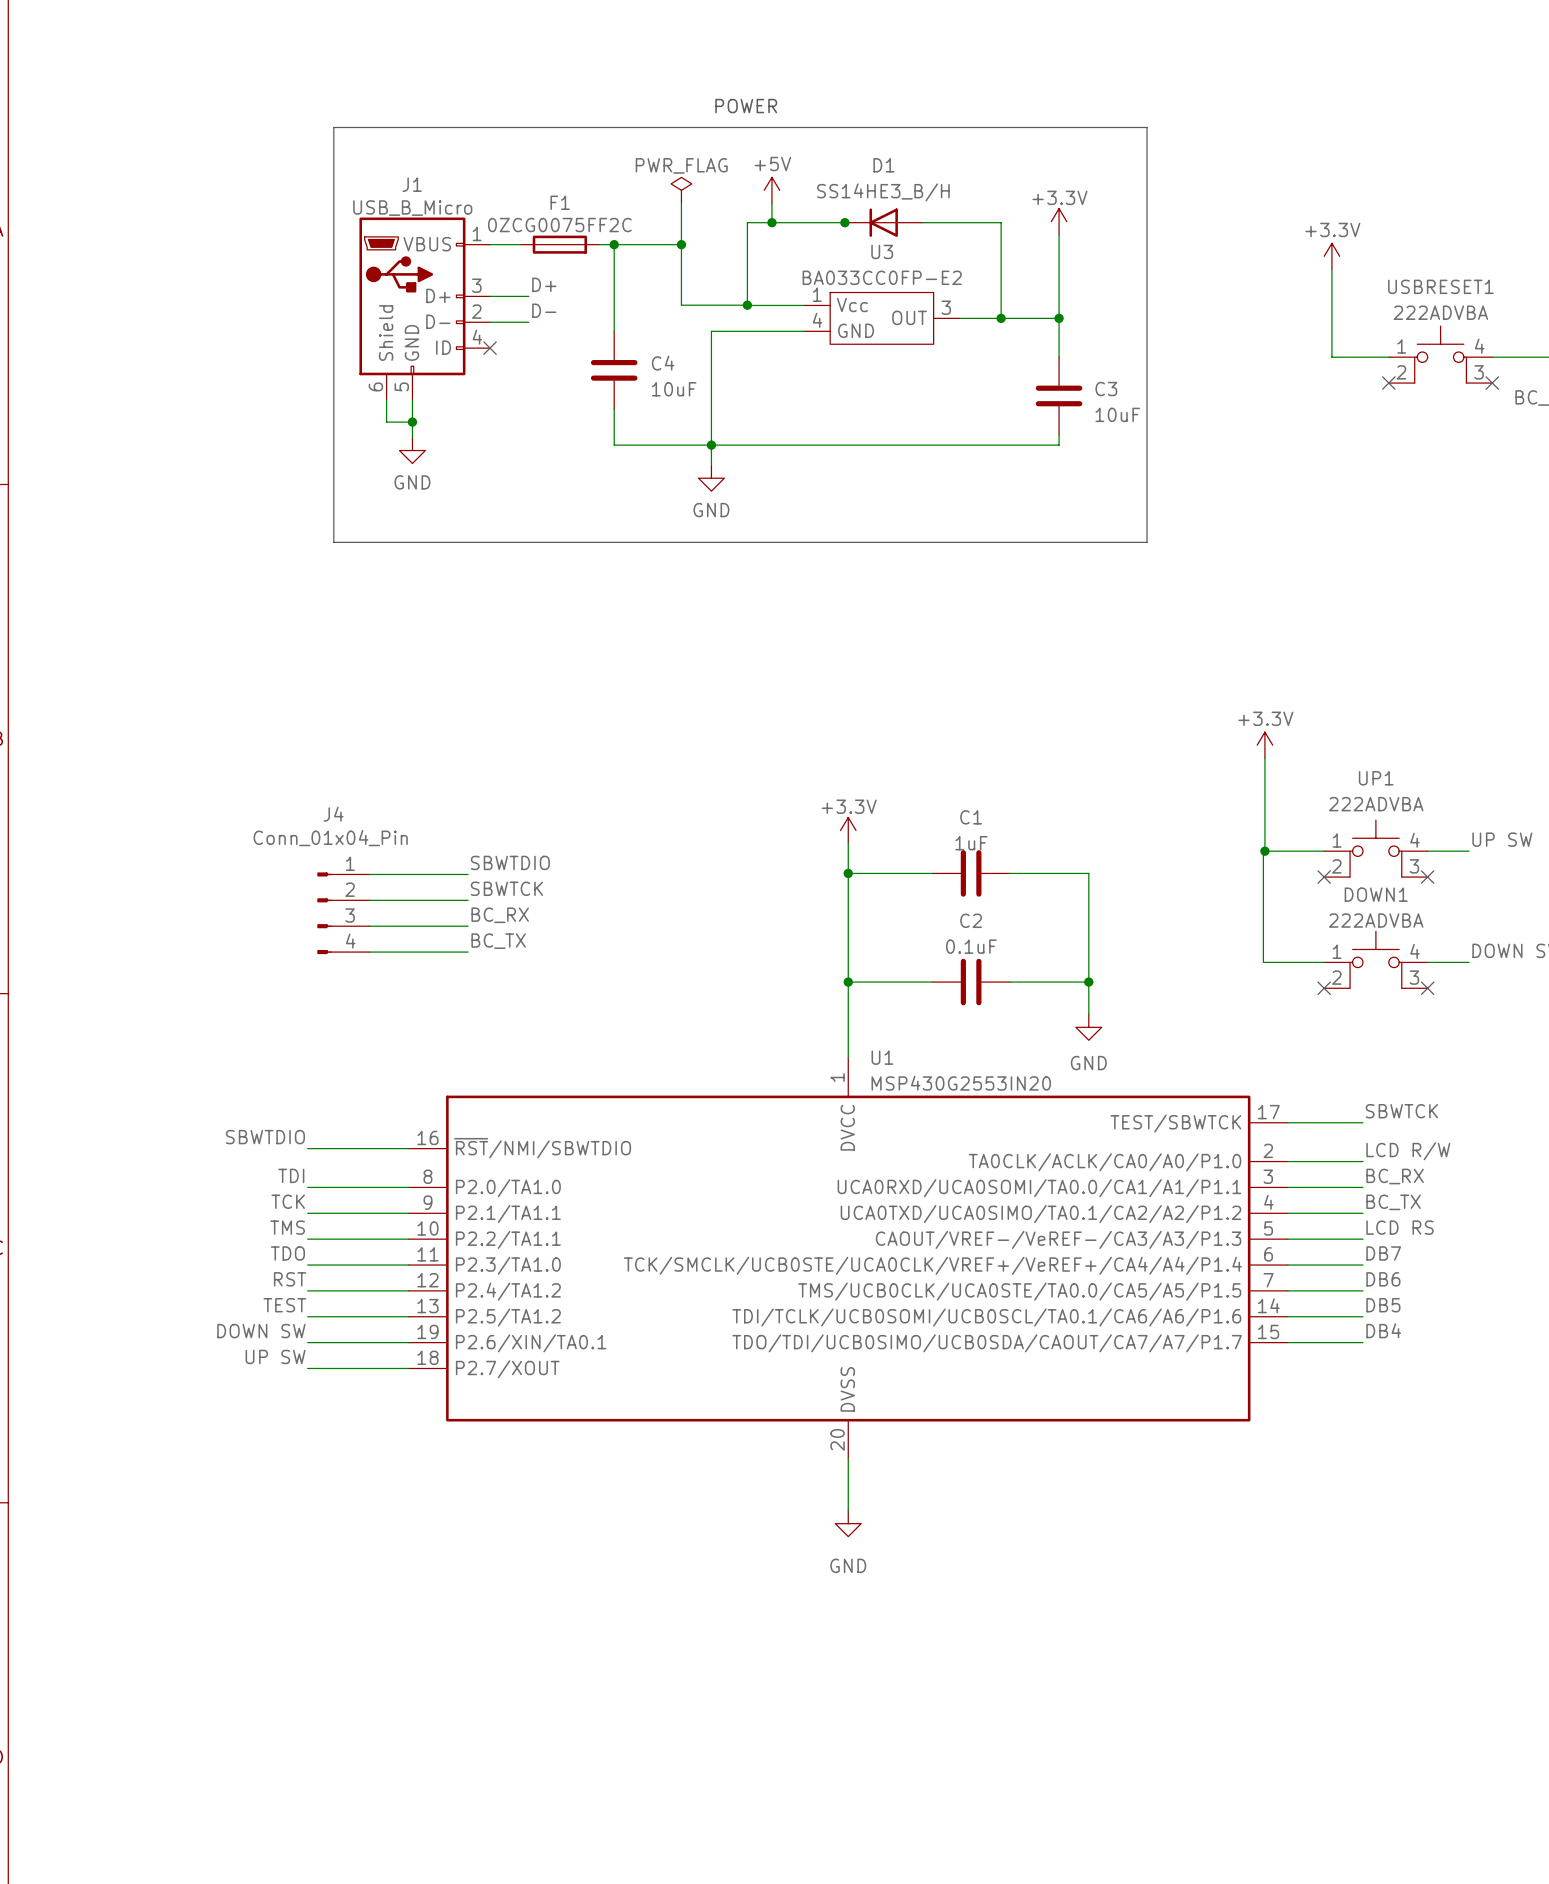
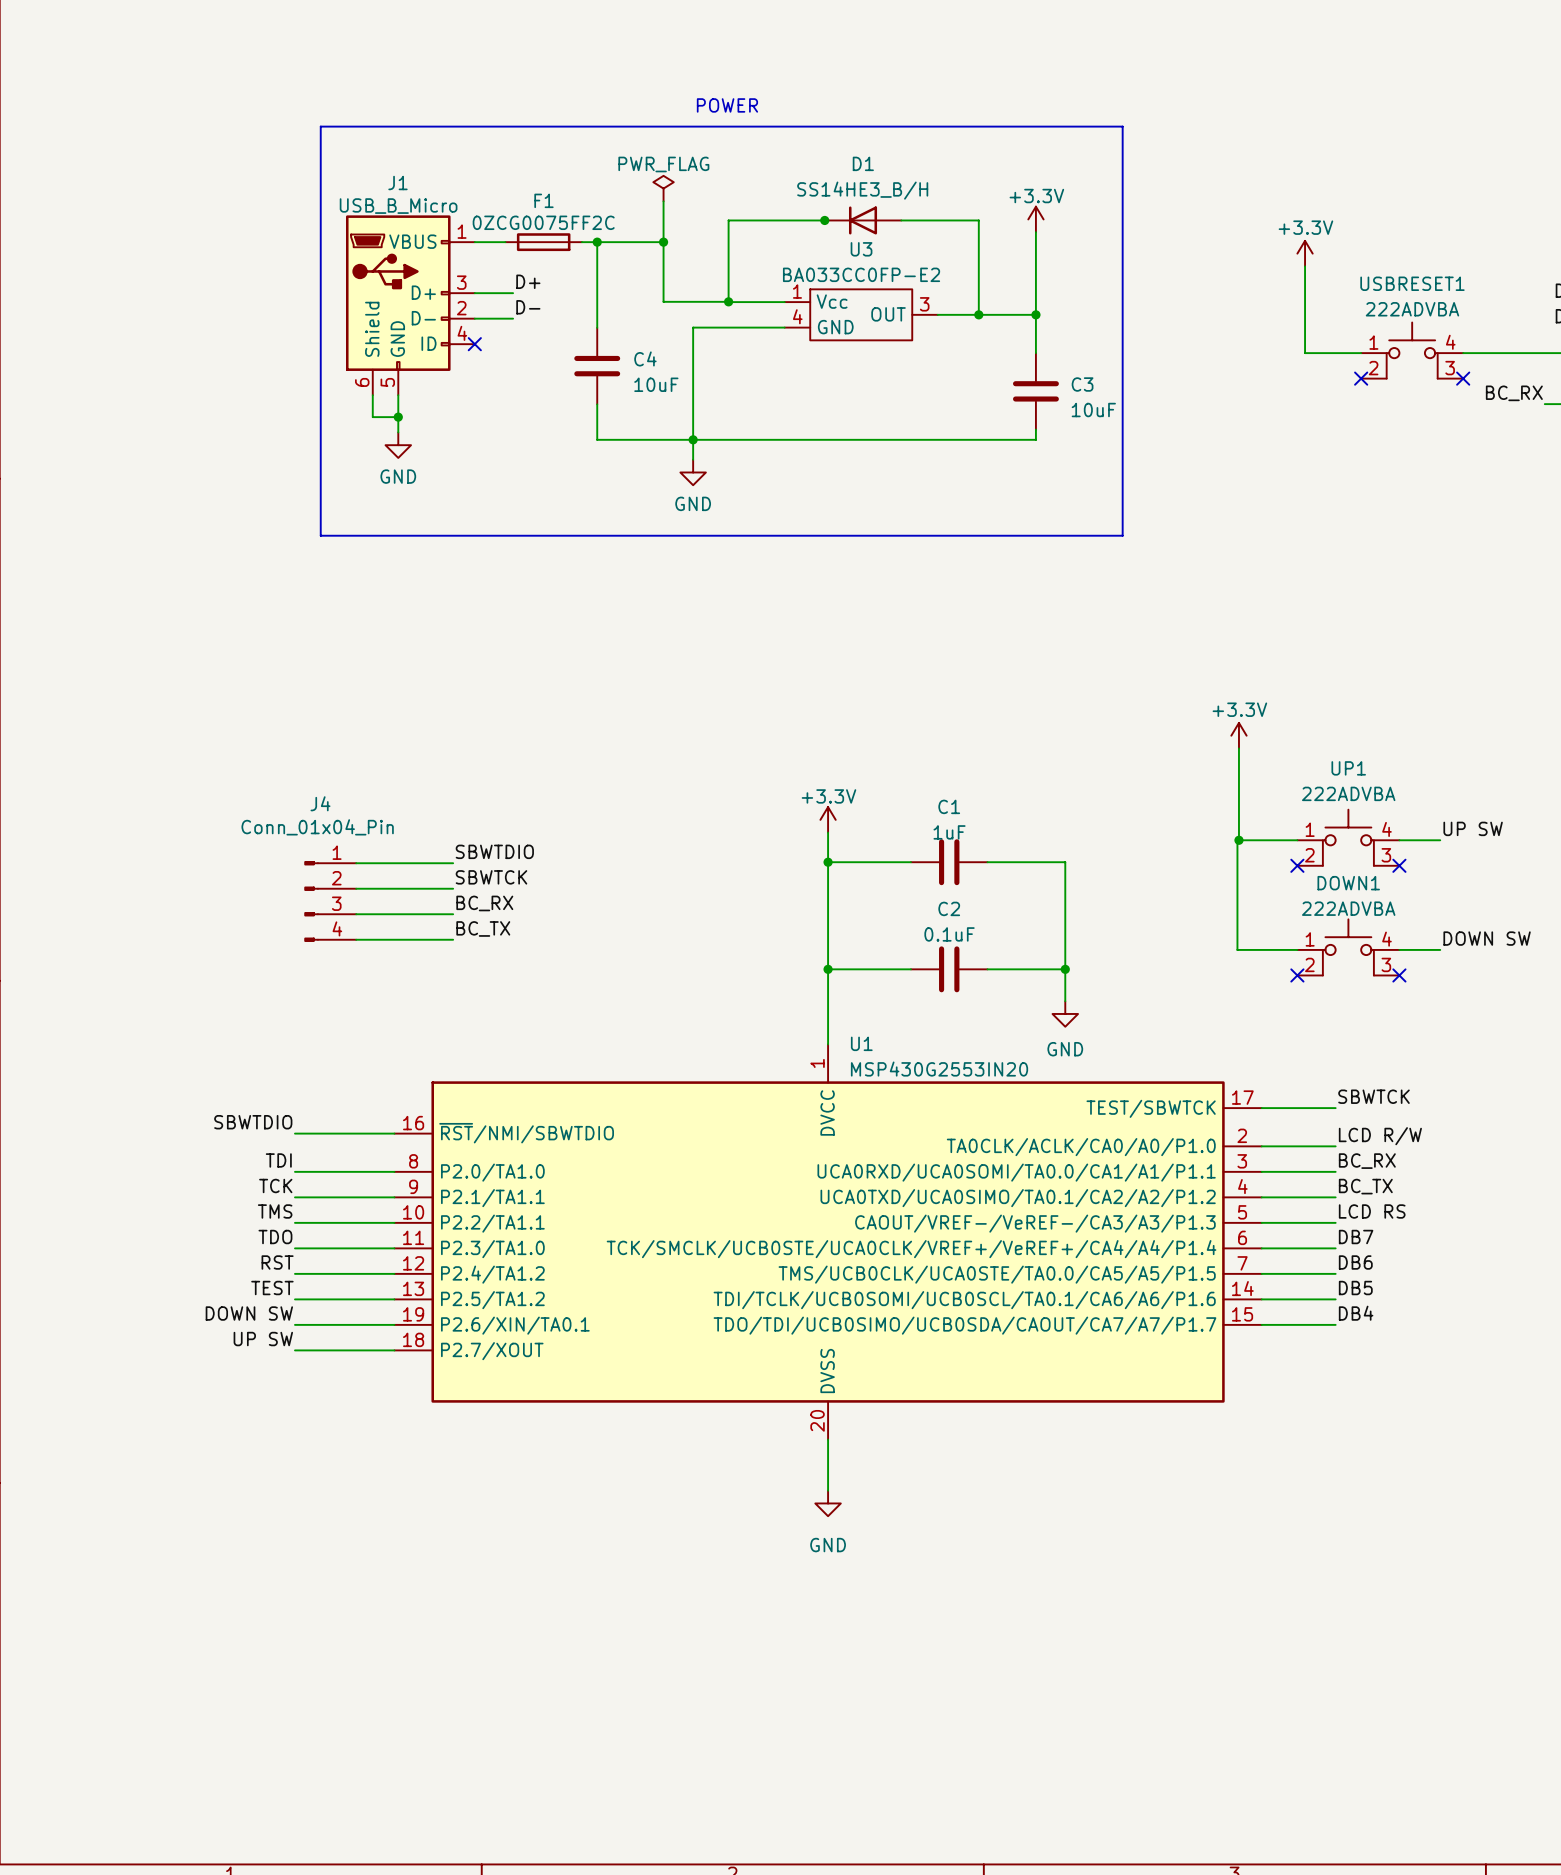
power symbol: +5V (771, 190) -> none
wire: (771, 203) (771, 222) -> none
junction: (771, 222) -> none

